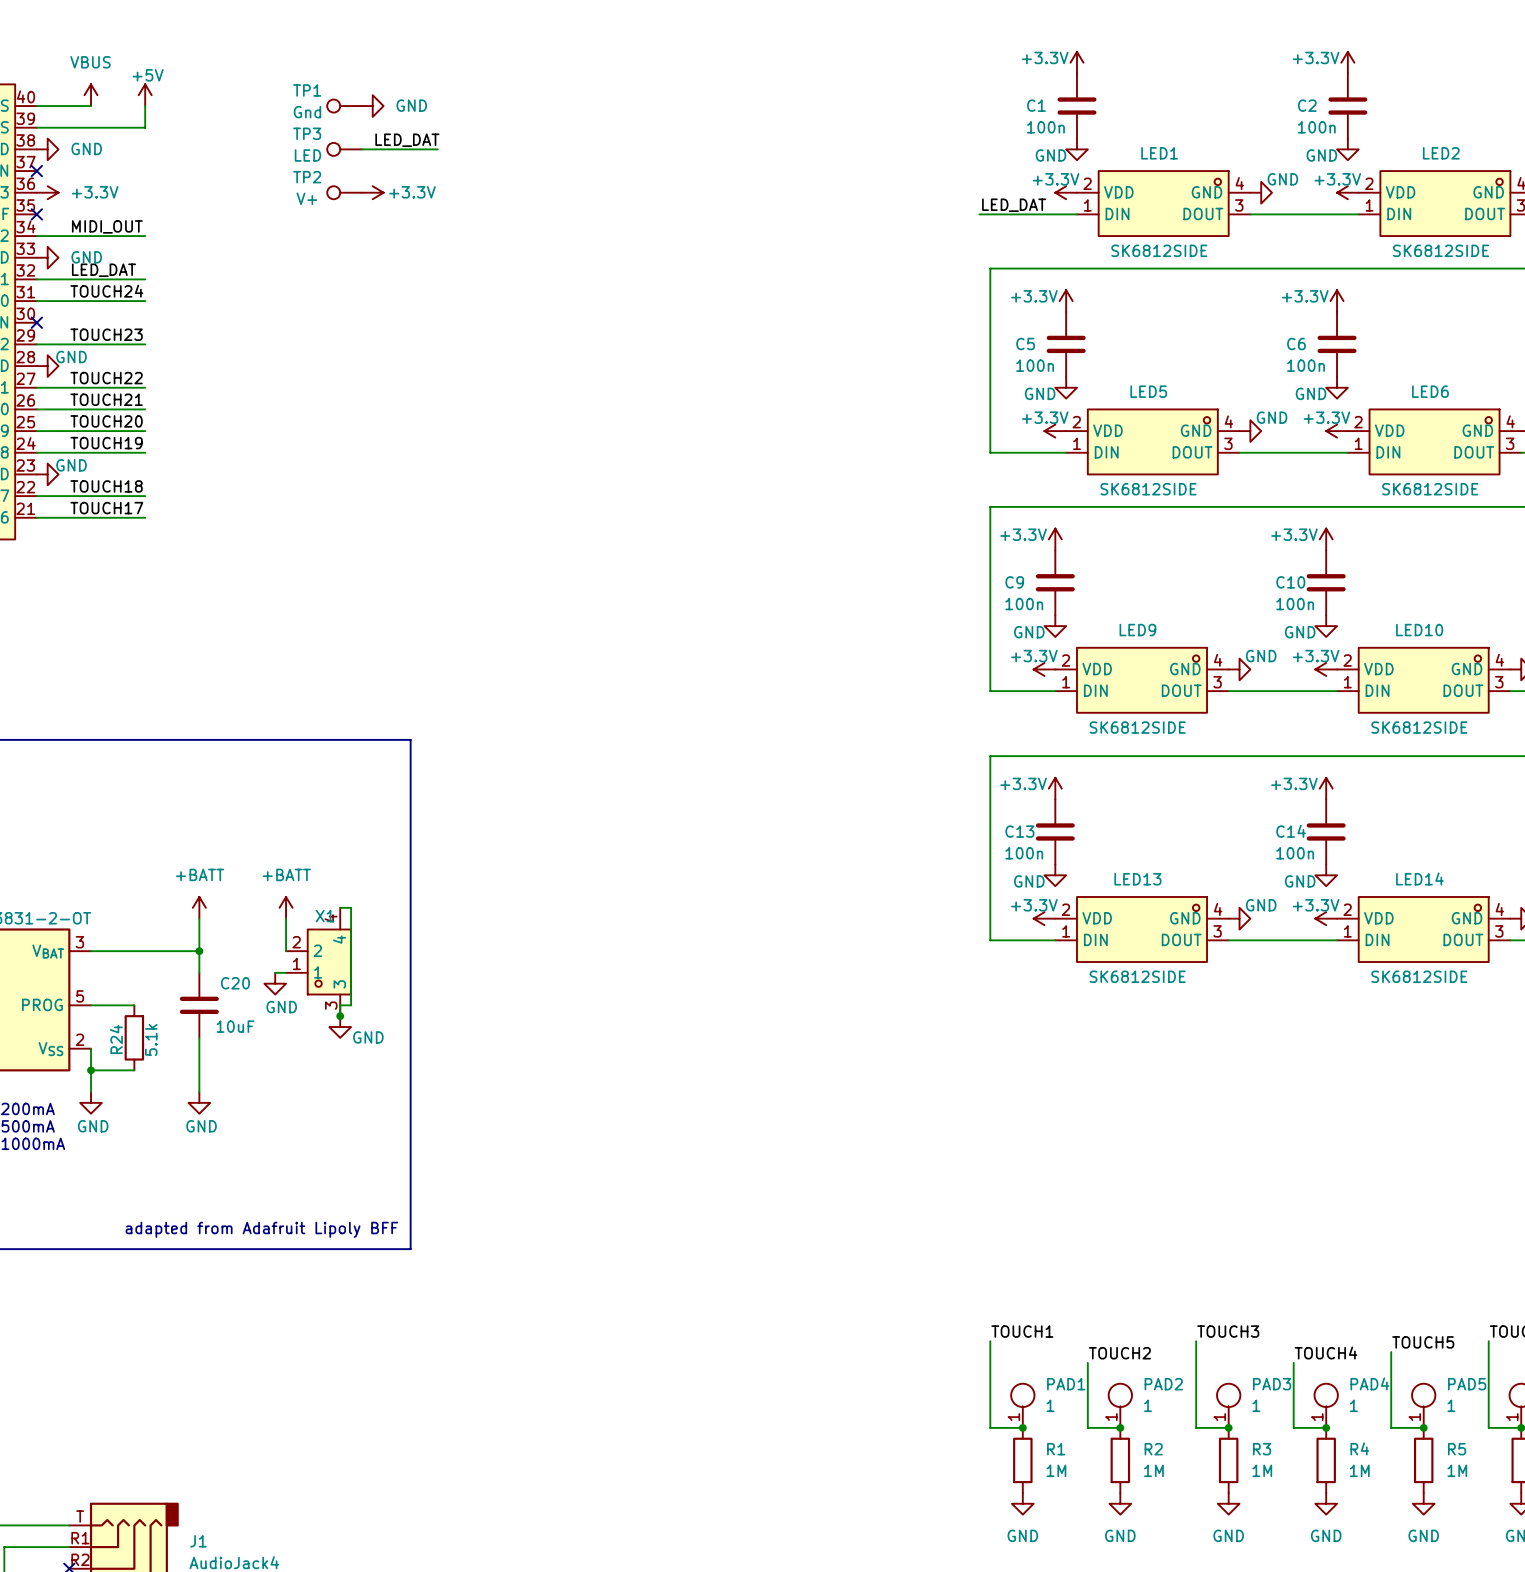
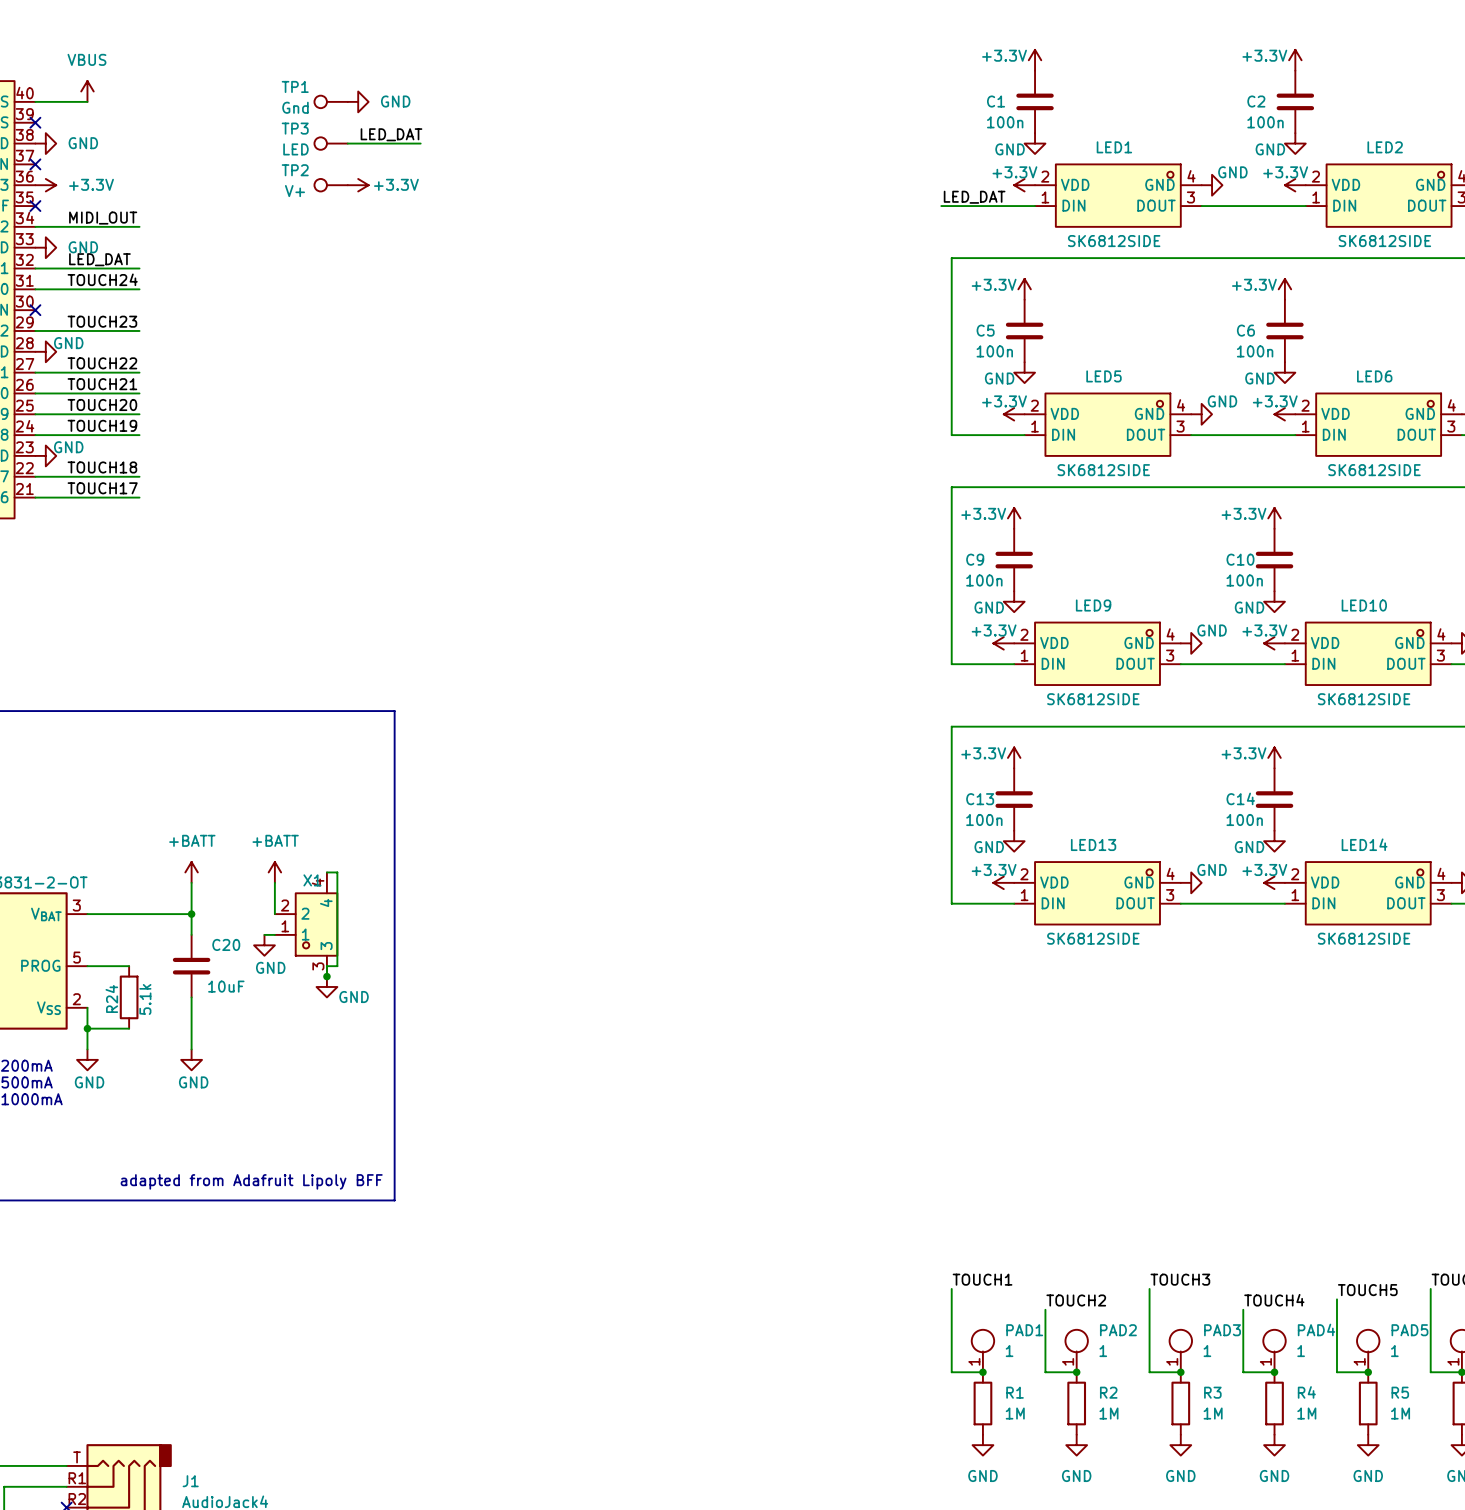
power symbol: +5V (145, 95) -> none
wire: (145, 106) (145, 127) (36, 127) -> none
no-connect mark: none -> (35, 122)

